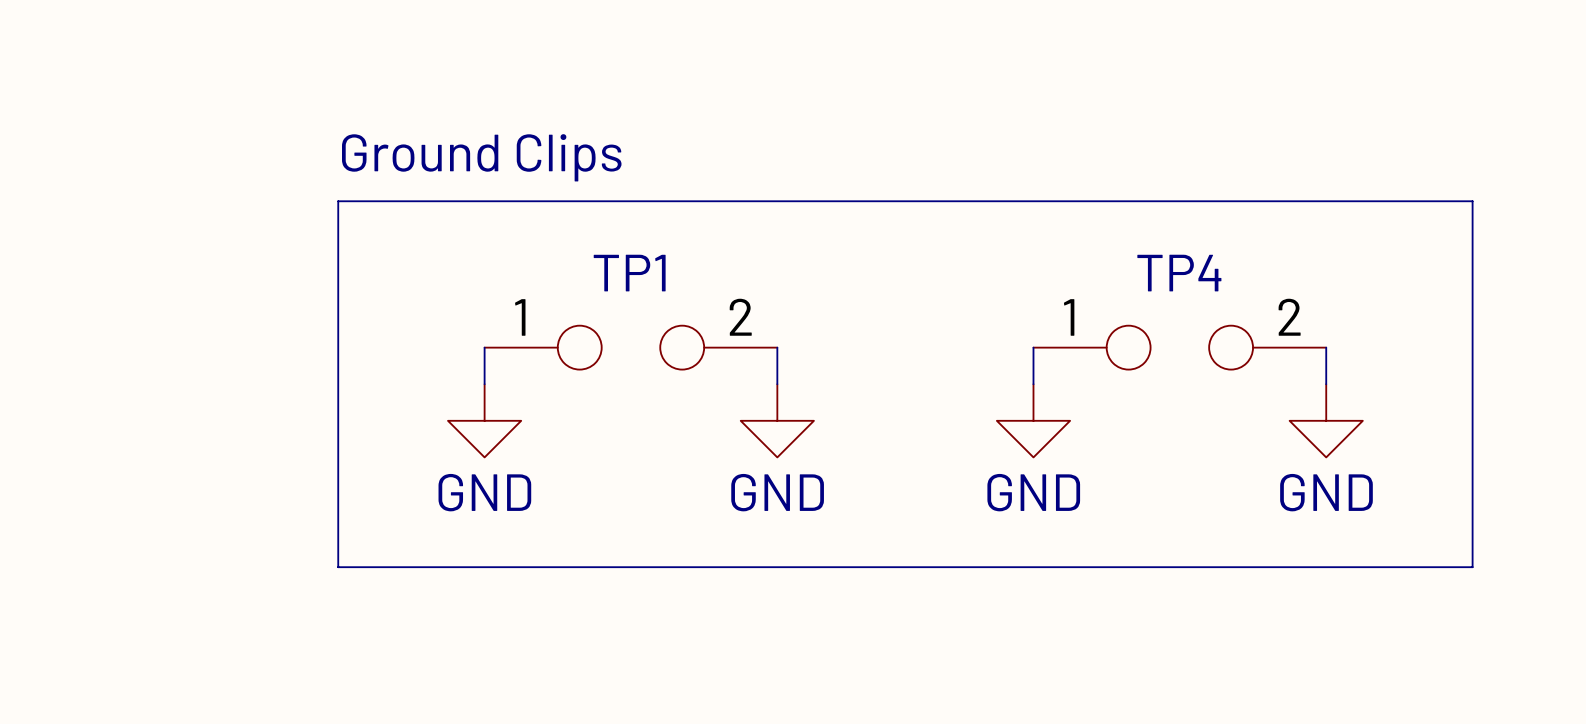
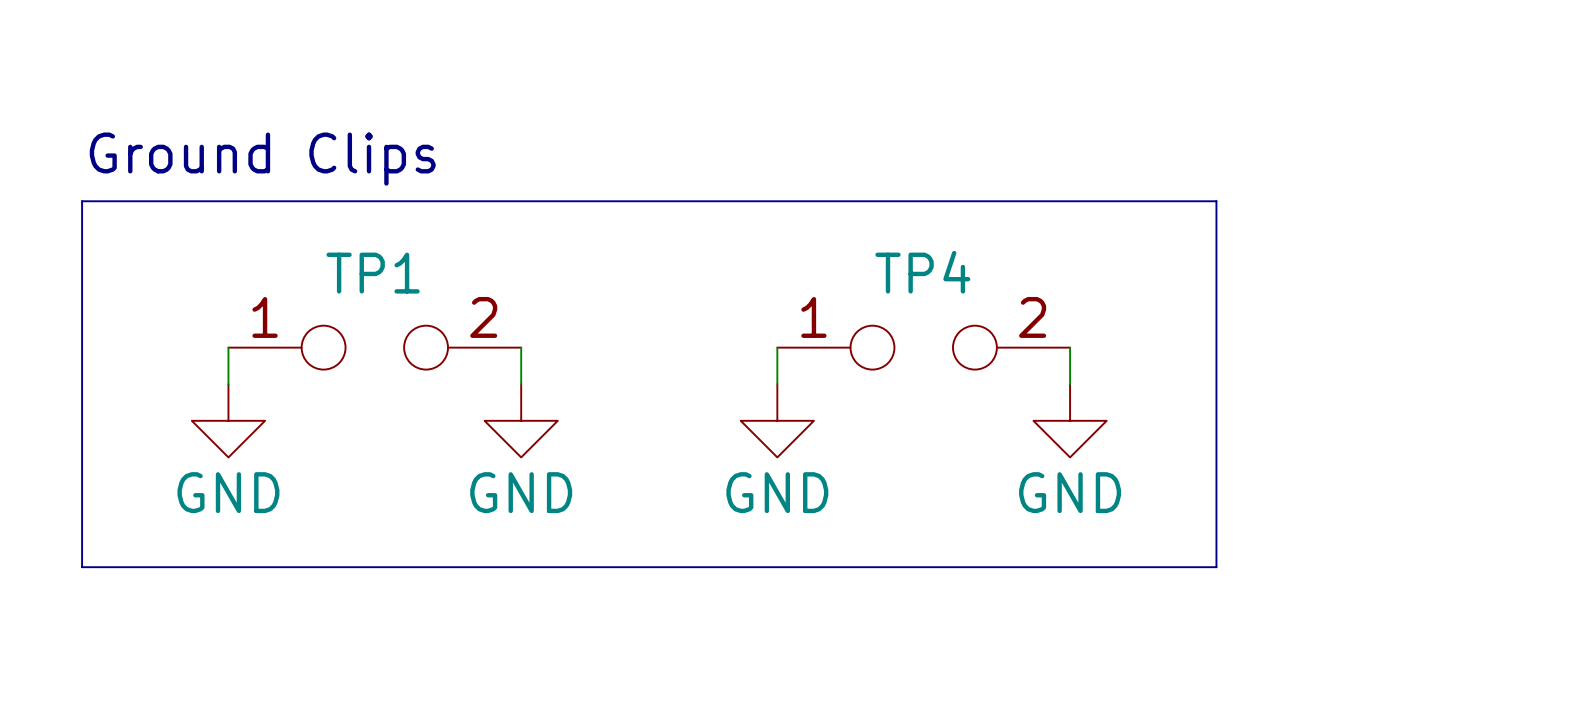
text position: Ground Clips (481, 157) -> Ground Clips (262, 159)
line: (338, 201) (338, 567) -> (338, 201) (82, 201) (82, 567) (338, 567)
line: (1216, 201) (1472, 201) (1472, 567) (1216, 567) -> (1216, 201) (1216, 567)
wire: none -> (228, 347) (228, 384)
wire: (484, 347) (484, 384) -> (521, 347) (521, 384)
TP1 position: (630, 347) -> (374, 347)
wire: (1033, 347) (1033, 384) -> (1070, 347) (1070, 384)
TP4 position: (1179, 347) -> (923, 347)
wire: (1326, 347) (1326, 384) -> none
power symbol: none -> GND (228, 420)
power symbol position: GND (484, 420) -> GND (521, 420)
power symbol position: GND (1033, 420) -> GND (1070, 420)
power symbol: GND (1326, 420) -> none

